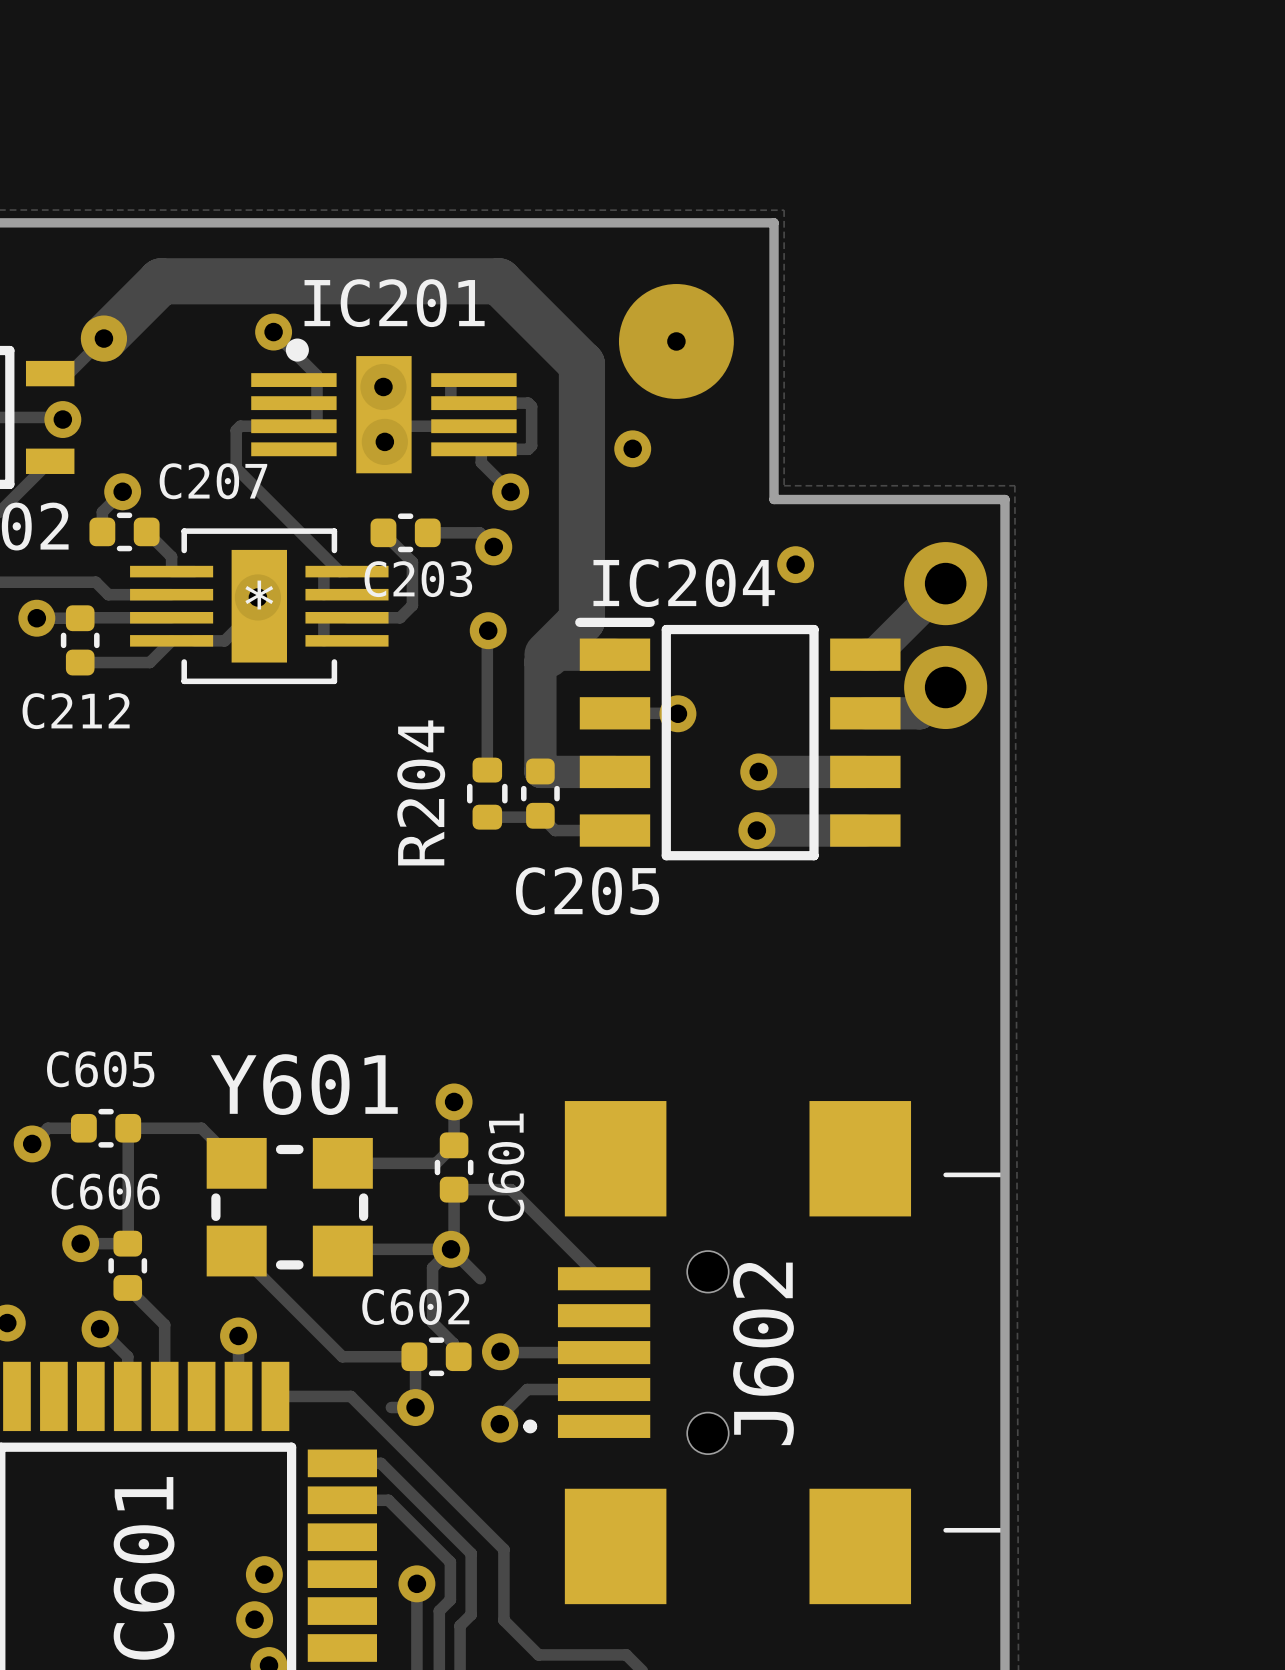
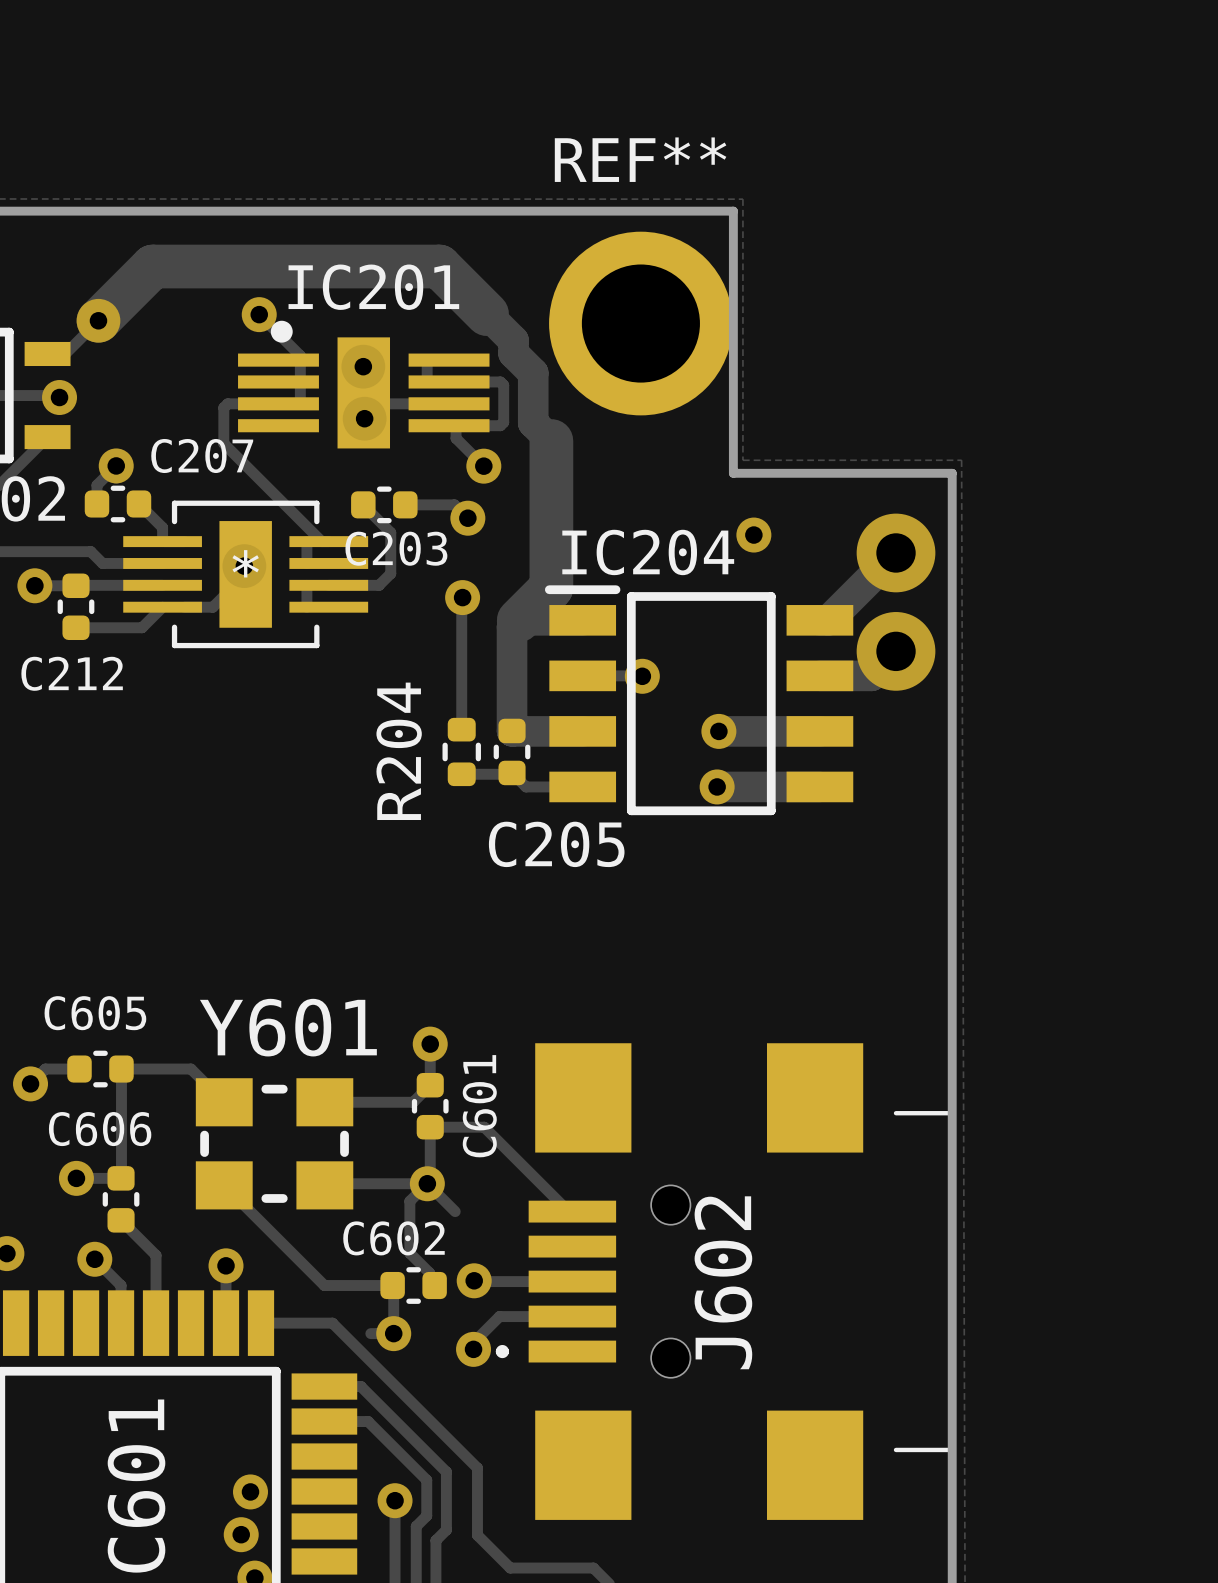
track: (463, 281) (498, 281) (581, 364) (581, 465) -> (439, 266) (513, 340) (513, 353) (533, 373) (533, 422) (551, 441)
REF**: none -> (640, 323)
via: (676, 341) -> none
via: (632, 448) -> none

